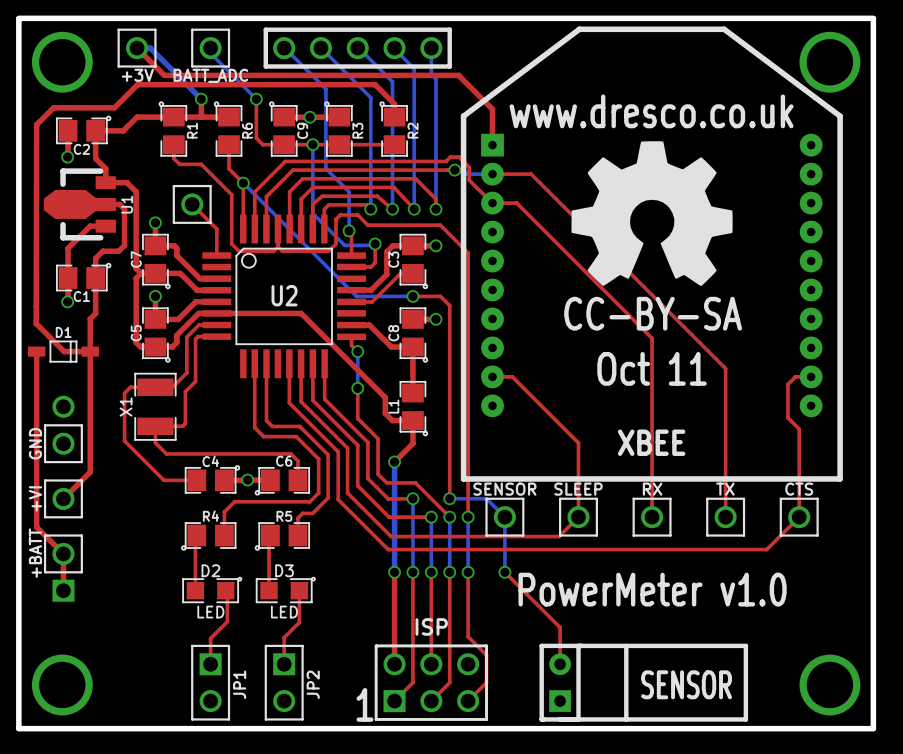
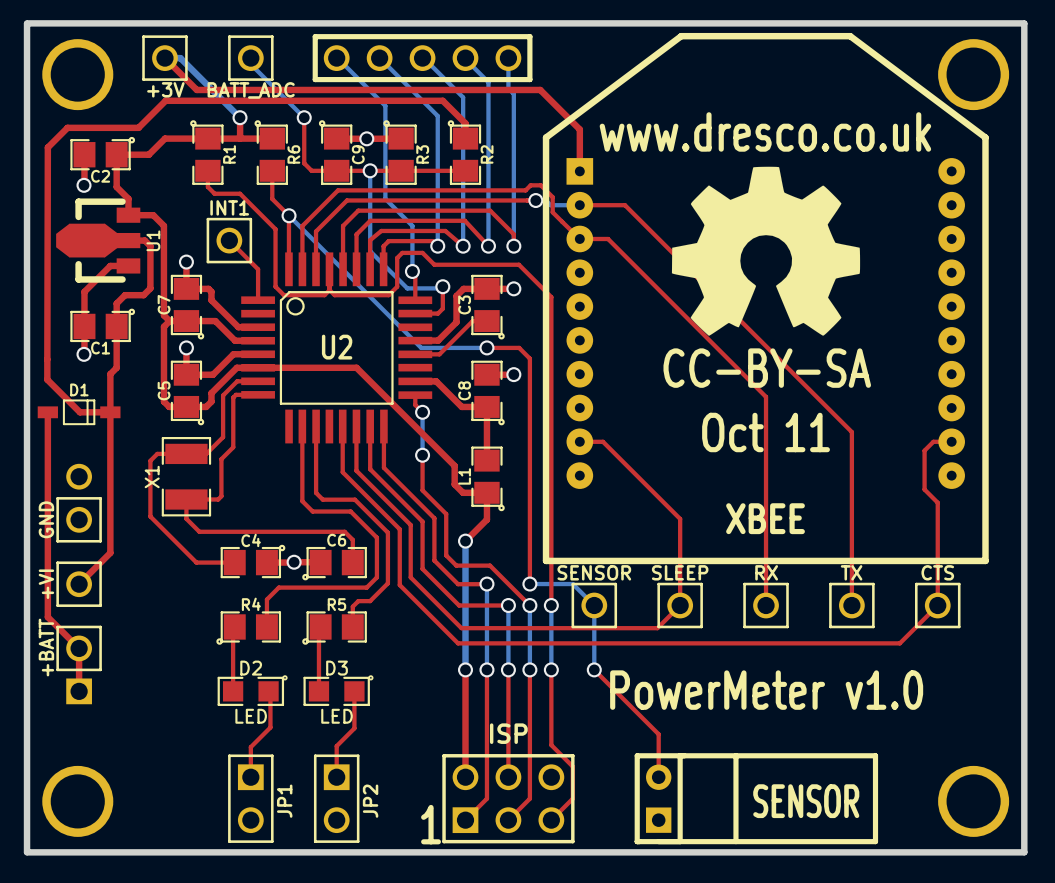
INT1 name: none -> INT1 (229, 207)

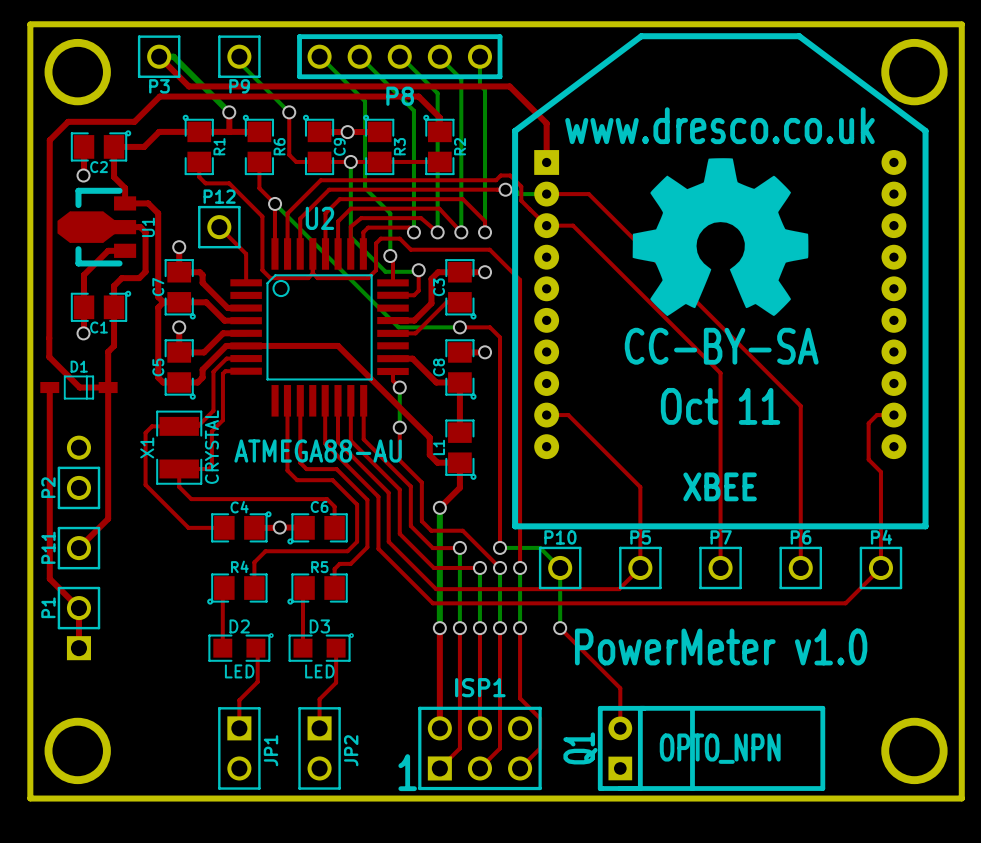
+3V name: +3V (165, 89) -> P3 (159, 86)
BATT_ADC name: BATT_ADC (251, 90) -> P9 (239, 86)
P8 name: none -> P8 (400, 96)
INT1 name: INT1 (229, 207) -> P12 (219, 196)
U2 name position: U2 (337, 347) -> U2 (319, 218)
X1 value: none -> CRYSTAL (211, 447)
U2 value: none -> ATMEGA88-AU (318, 451)
GND name: GND (46, 519) -> P2 (48, 487)
SENSOR name: SENSOR (594, 572) -> P10 (560, 537)
SLEEP name: SLEEP (680, 572) -> P5 (640, 537)
RX name: RX (766, 572) -> P7 (721, 537)
TX name: TX (851, 572) -> P6 (801, 537)
CTS name: CTS (937, 572) -> P4 (881, 537)
+VI name: +VI (46, 584) -> P11 (48, 547)
+BATT name: +BATT (46, 647) -> P1 (48, 607)
ISP name: ISP (508, 733) -> ISP1 (480, 687)
SENSOR value: none -> OPTO_NPN (720, 748)
SENSOR name: SENSOR (806, 801) -> Q1 (580, 748)

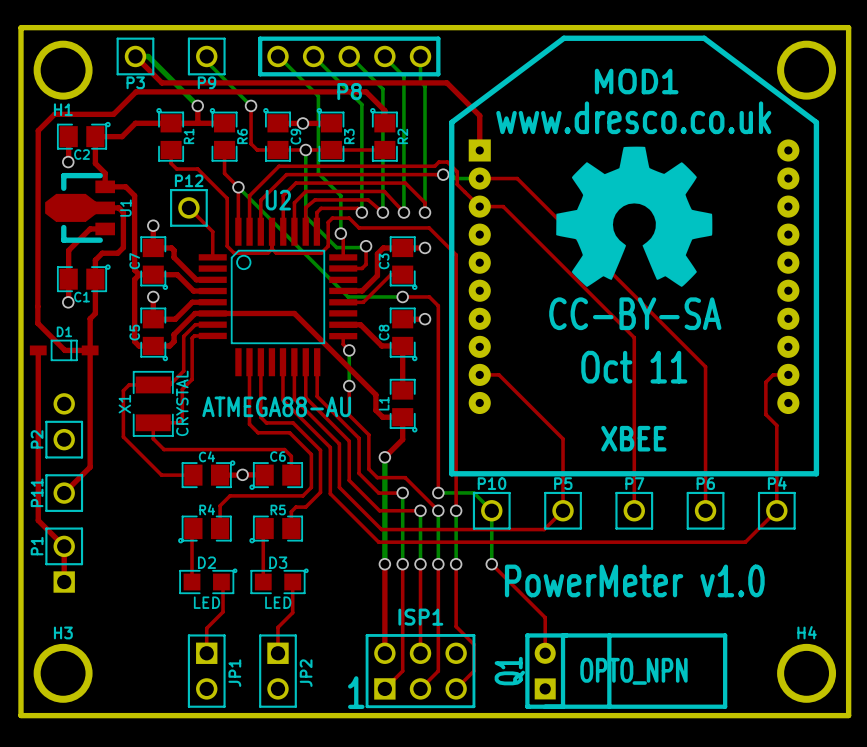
MOD1 name: none -> MOD1 (636, 81)
H1 name: none -> H1 (63, 109)
H3 name: none -> H3 (63, 632)
H4 name: none -> H4 (807, 632)

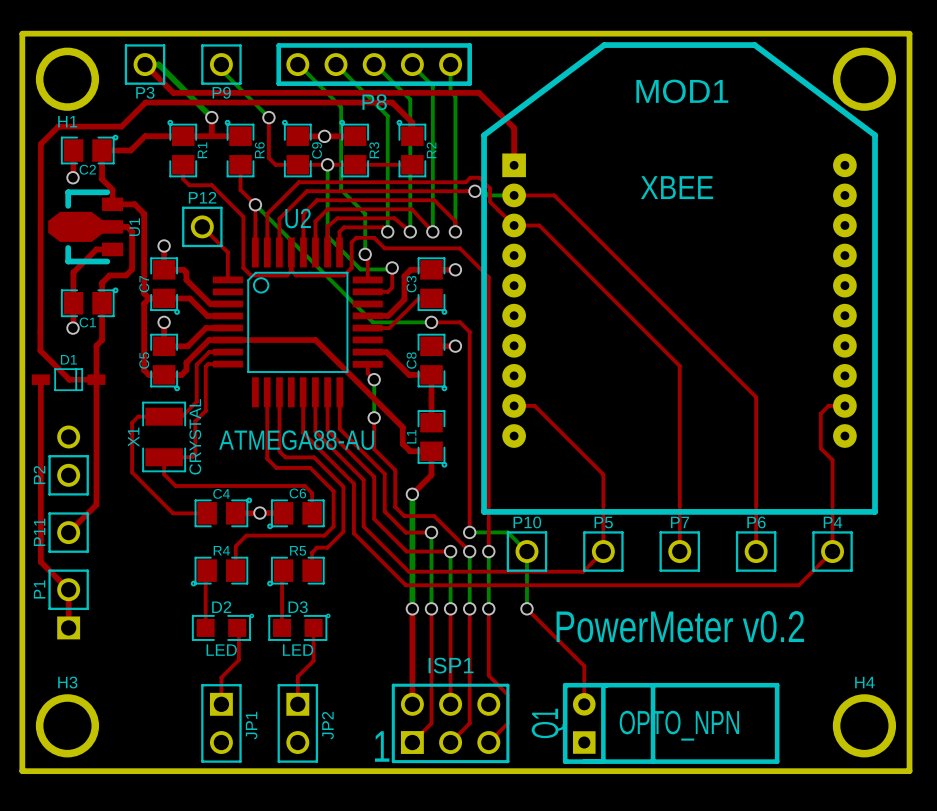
text: www.dresco.co.uk (633, 117) -> none
drawing: [556, 146, 713, 287] -> none
text: CC-BY-SA (635, 313) -> none
text: Oct 11 (634, 367) -> none
MOD1 value position: XBEE (633, 438) -> XBEE (676, 187)
text: PowerMeter v1.0 (634, 580) -> PowerMeter v0.2 (680, 626)

